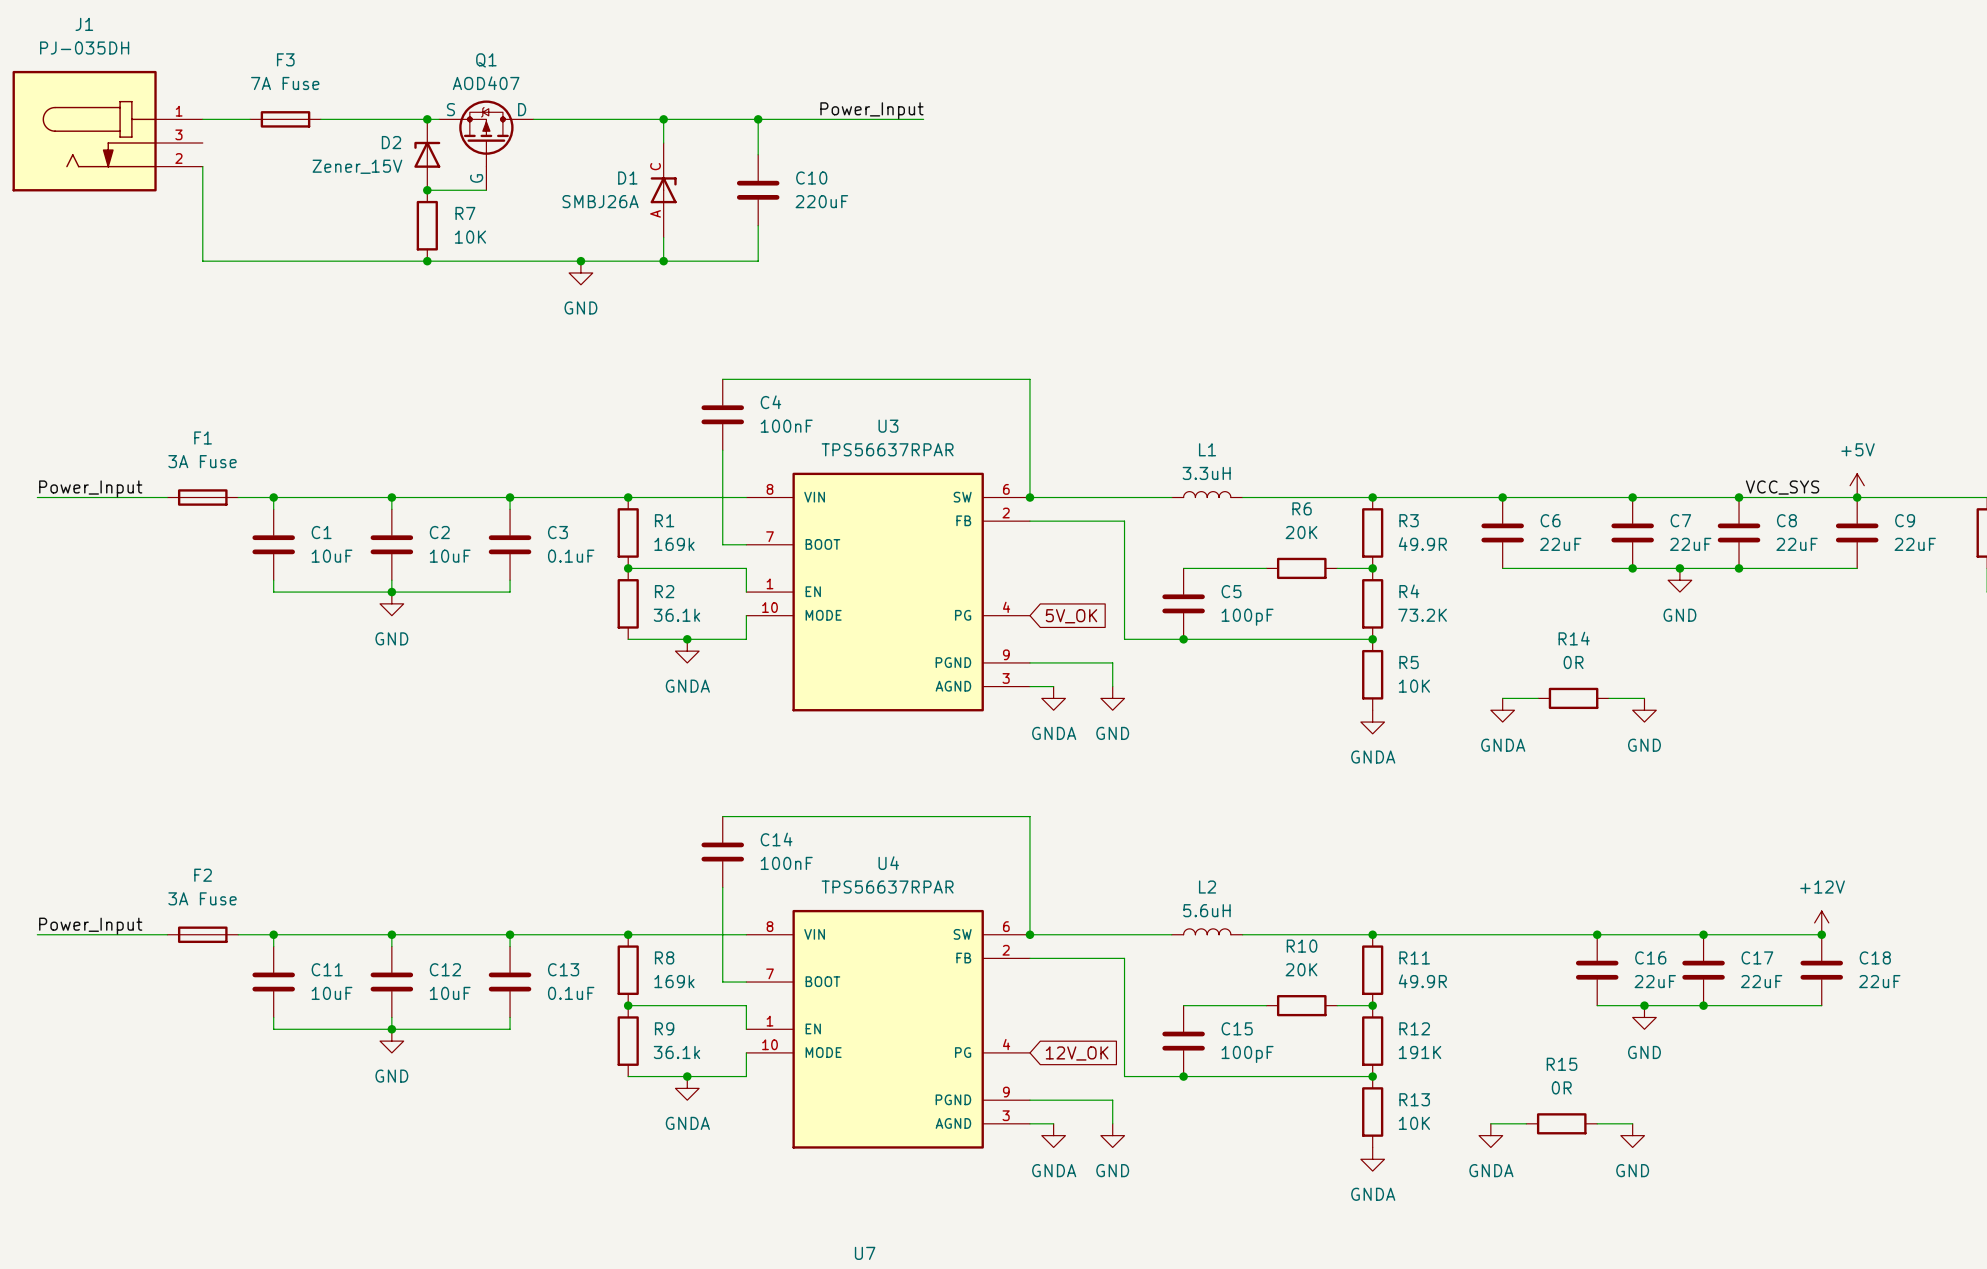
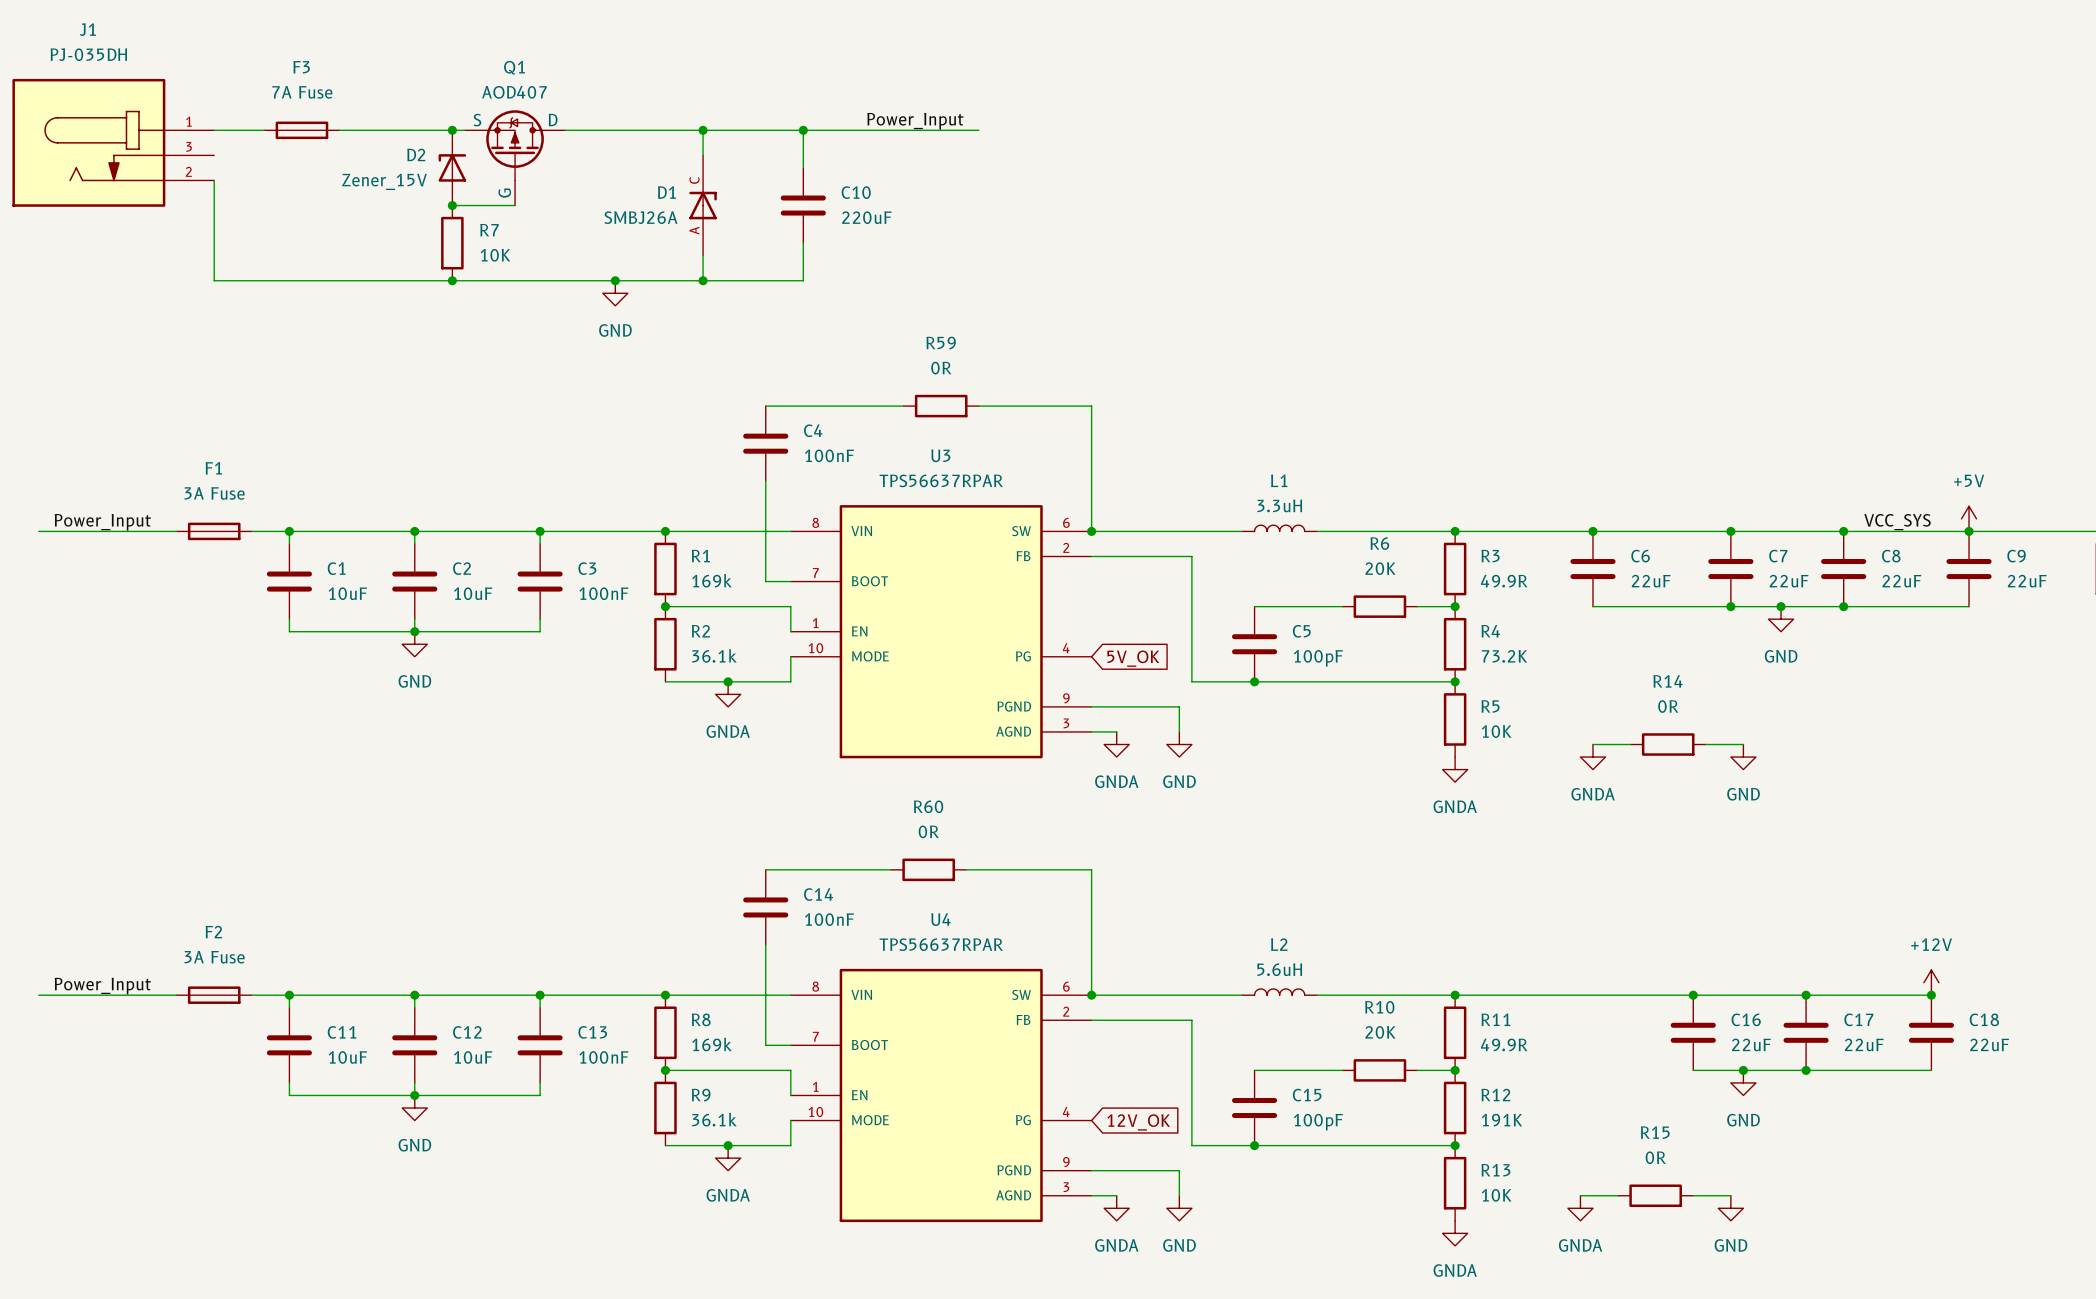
wire: (852, 379) (923, 379) -> none
R59: none -> 0R (941, 406)
C3 value: 0.1uF (571, 556) -> 100nF (603, 593)
wire: (840, 816) (911, 816) -> none
R60: none -> 0R (928, 869)
C13 value: 0.1uF (571, 993) -> 100nF (603, 1057)

